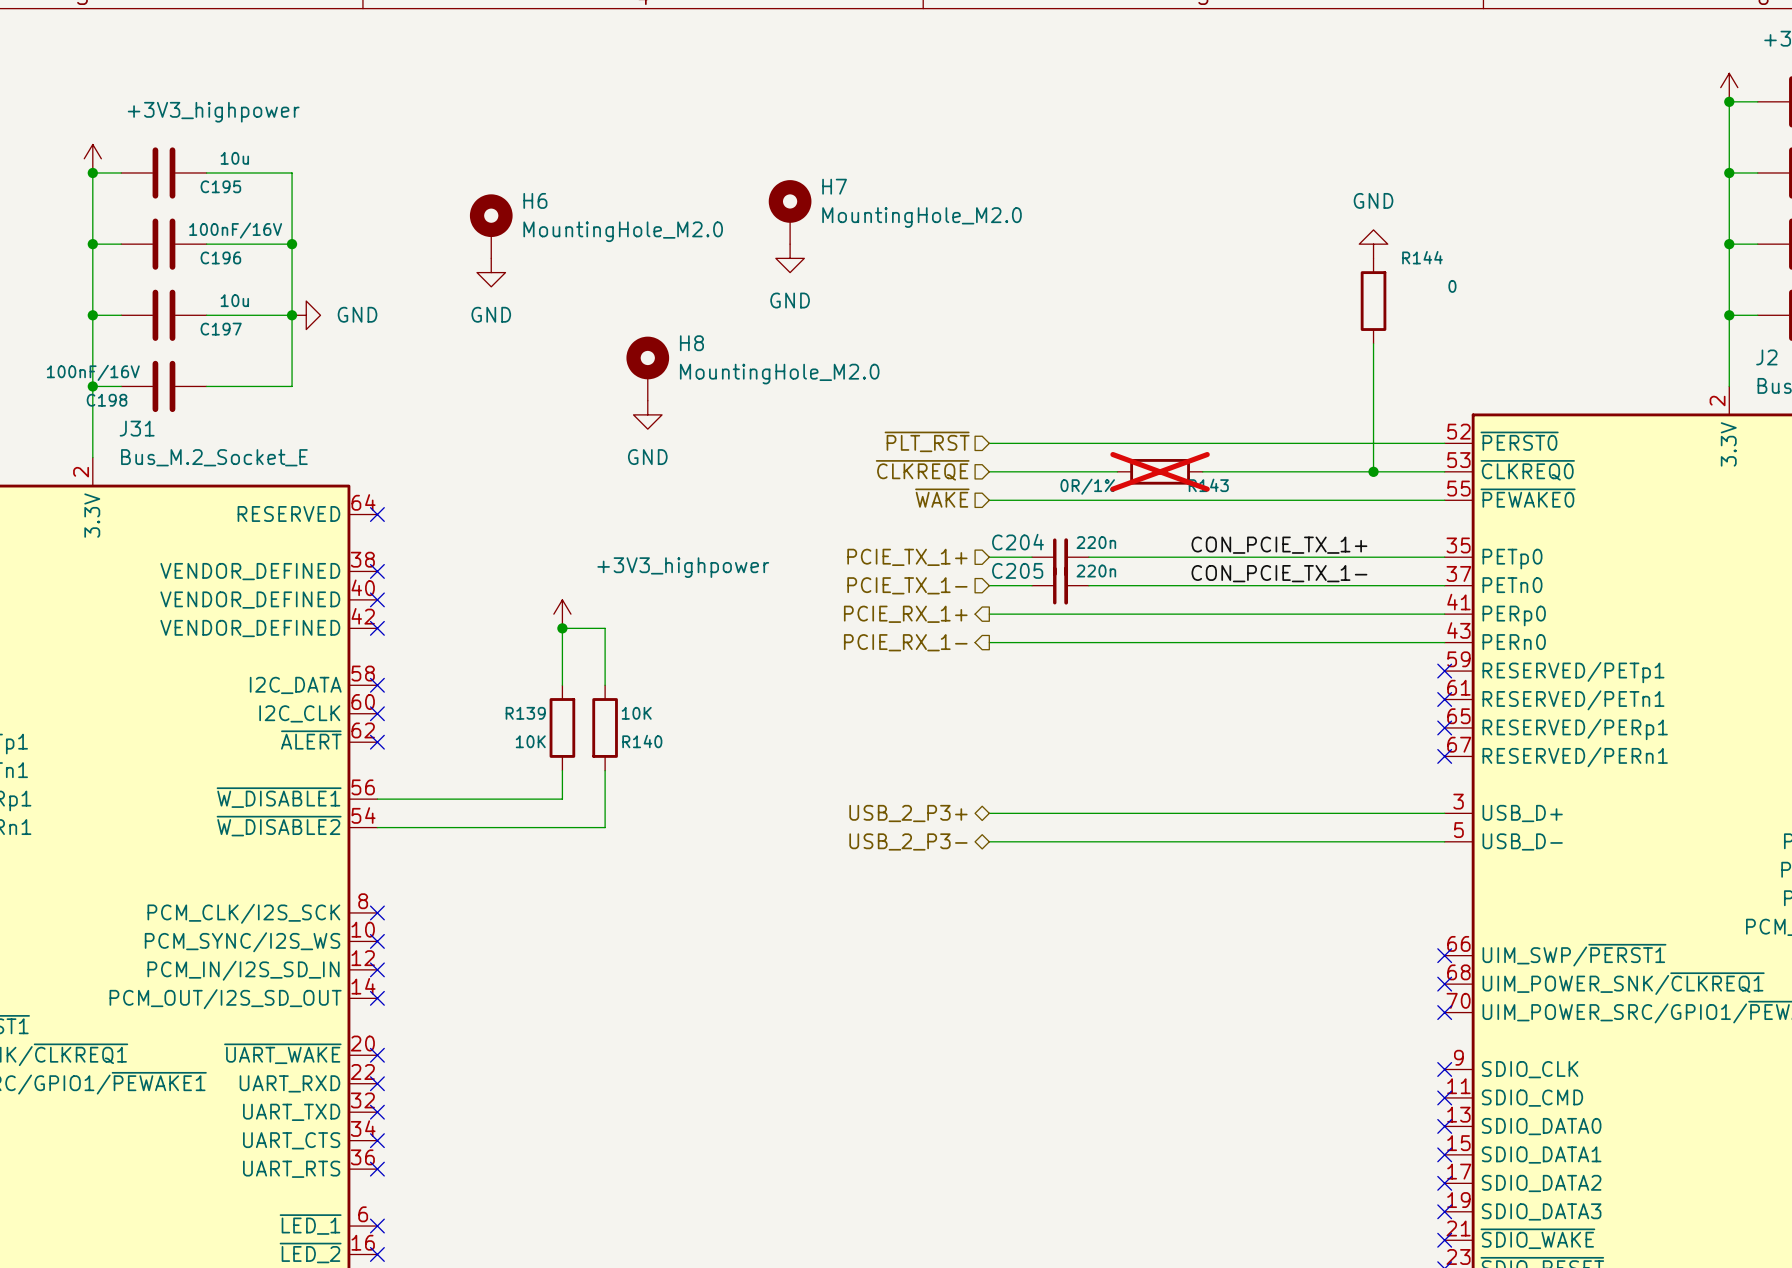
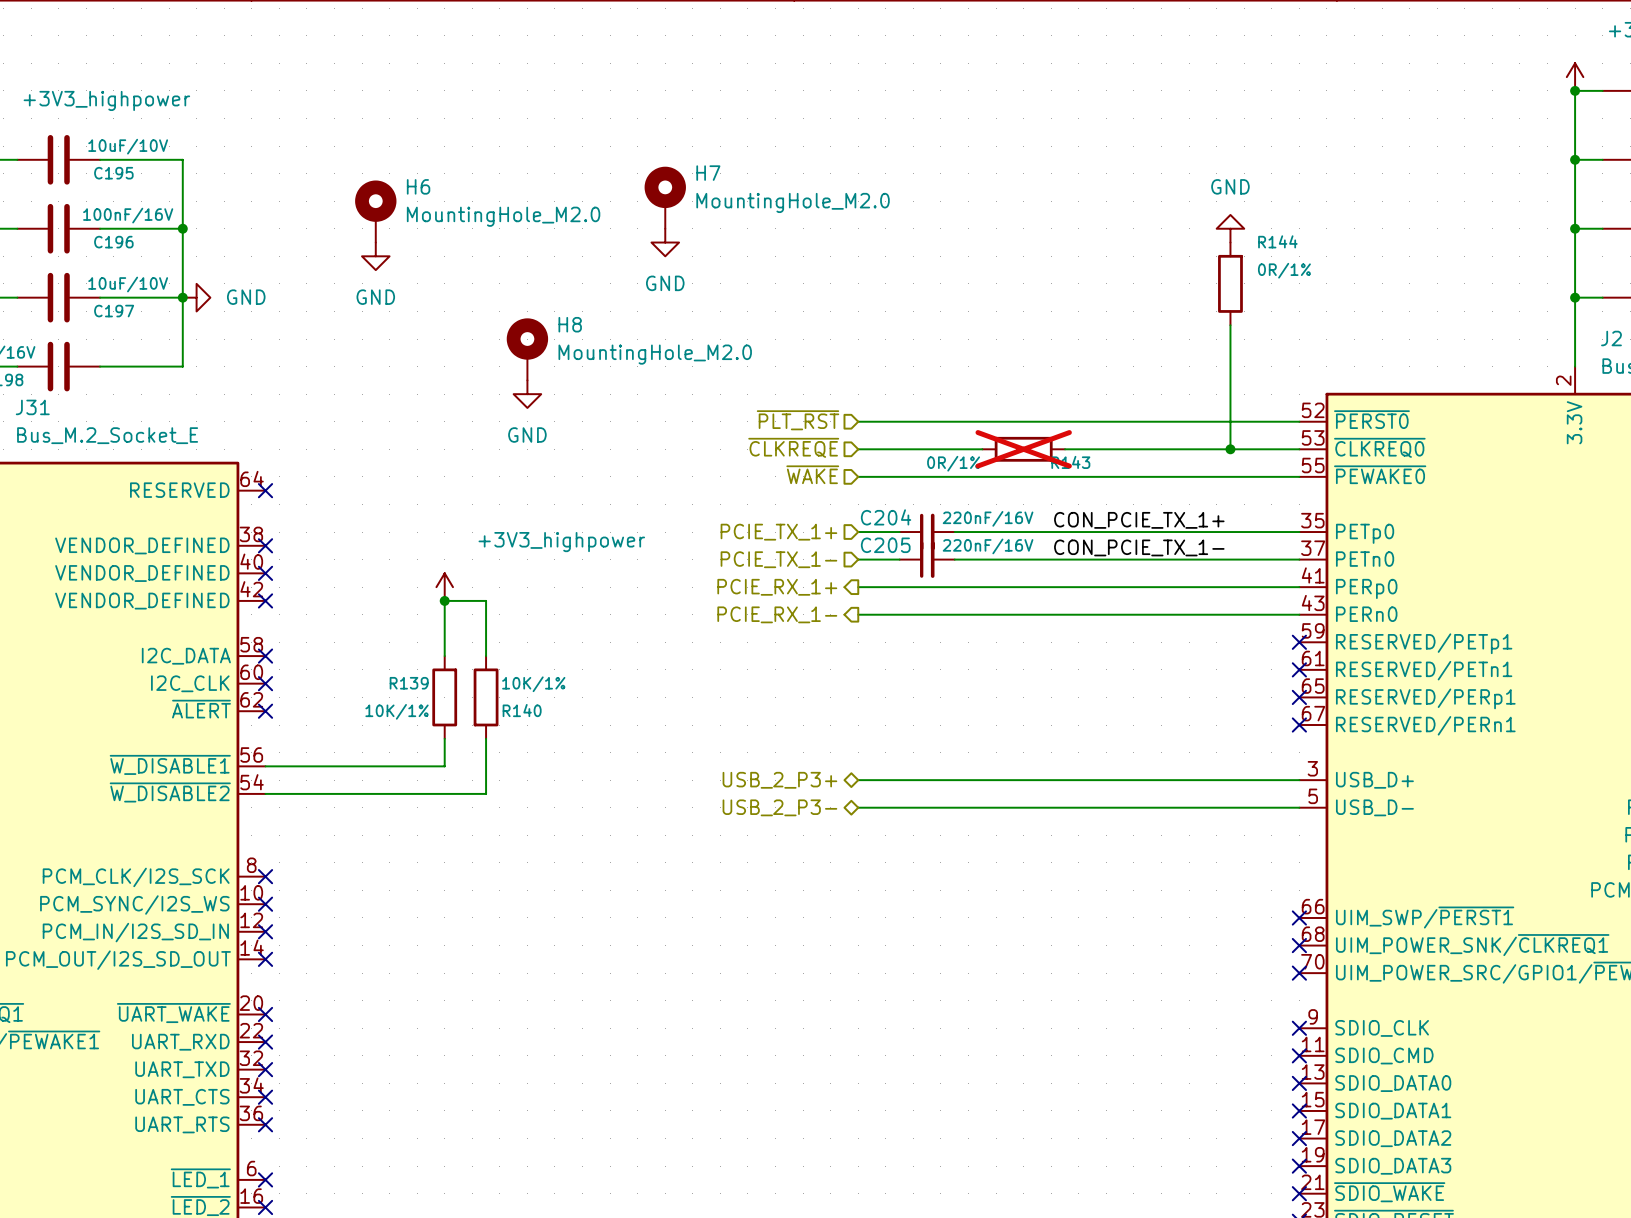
C195 value: 10u (234, 158) -> 10uF/10V (128, 146)
R144 value: 0 (1452, 286) -> 0R/1% (1284, 270)
C197 value: 10u (234, 300) -> 10uF/10V (128, 284)
C204 value: 220n (1096, 542) -> 220nF/16V (988, 518)
C205 value: 220n (1096, 571) -> 220nF/16V (988, 546)
R140 value: 10K (636, 713) -> 10K/1% (533, 684)
R139 value: 10K (530, 741) -> 10K/1% (397, 711)

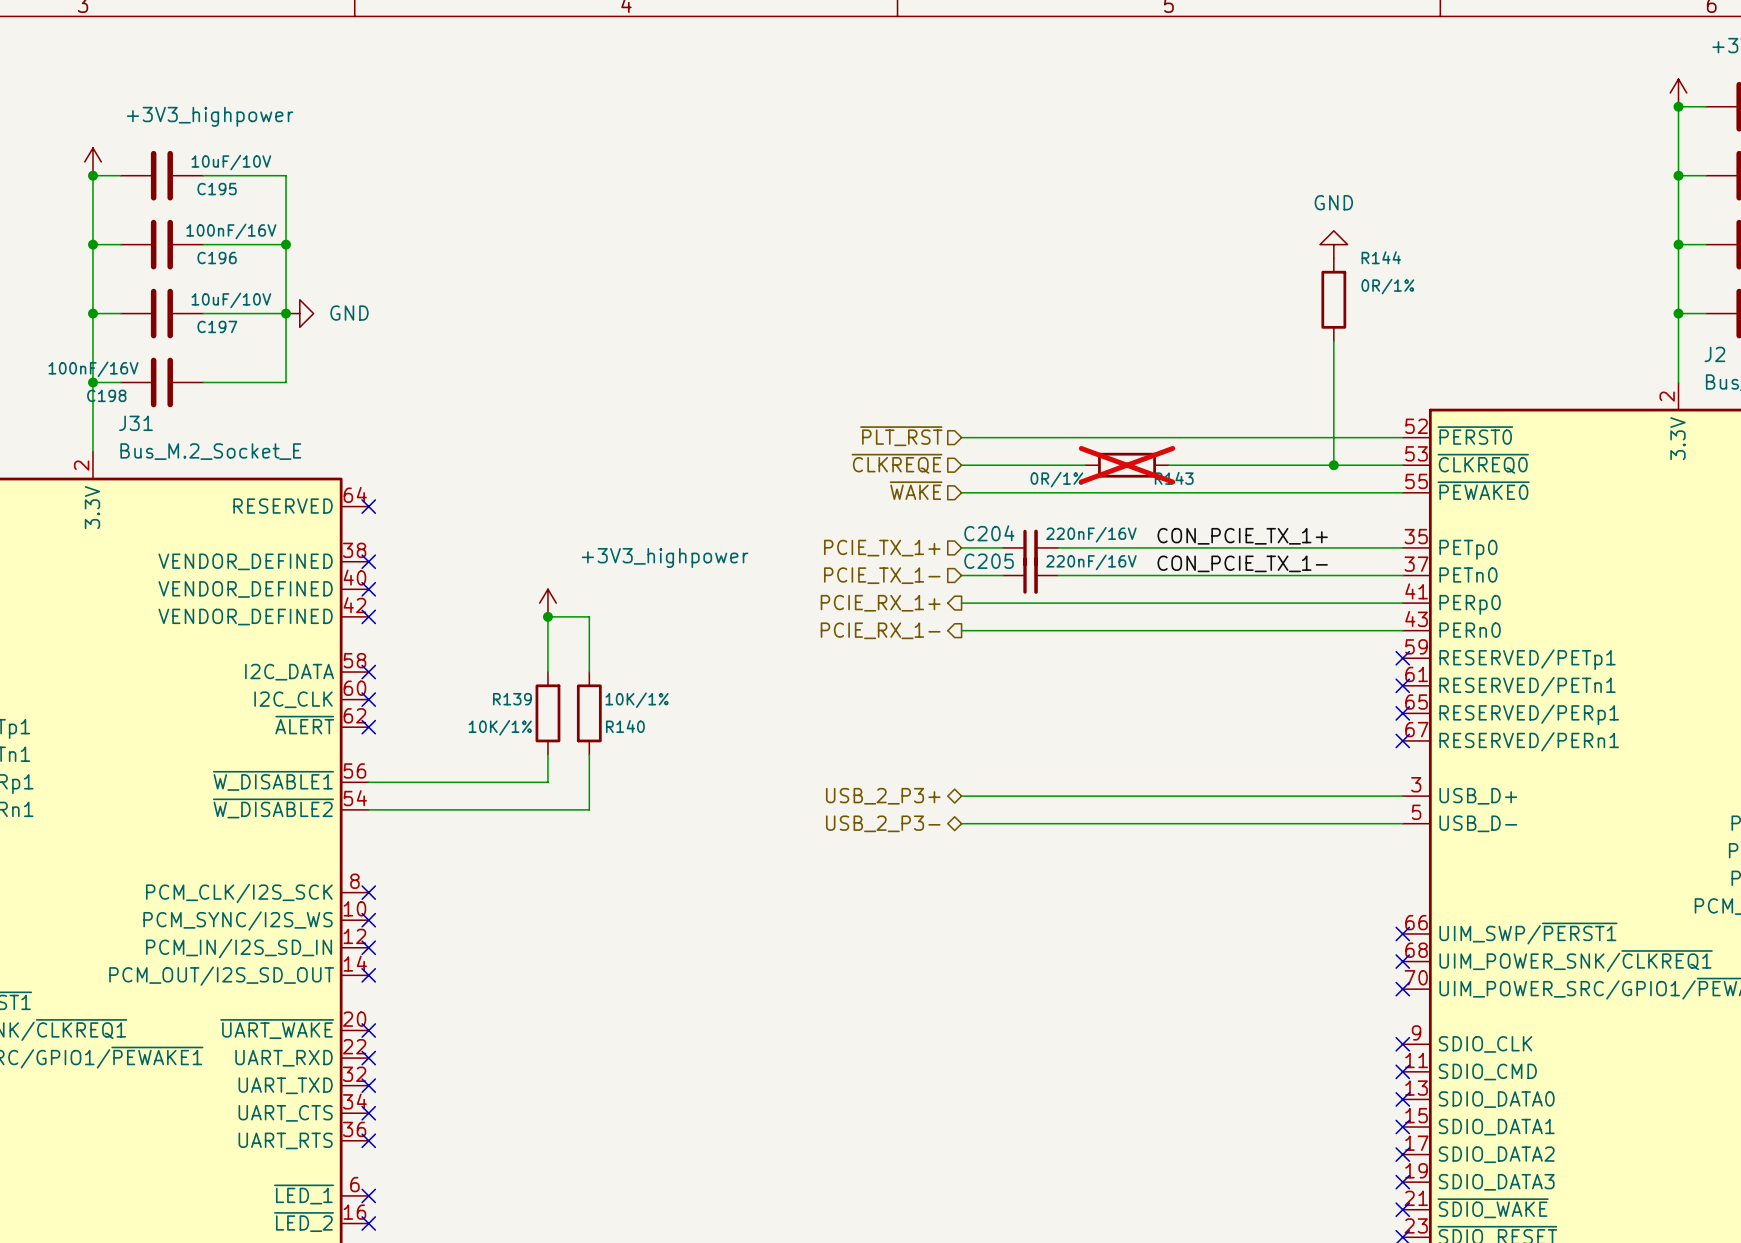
H7: MountingHole_M2.0 (665, 197) -> none
H6: MountingHole_M2.0 (375, 211) -> none
power symbol: GND (665, 242) -> none
power symbol: GND (375, 256) -> none
H8: MountingHole_M2.0 (527, 349) -> none
power symbol: GND (527, 394) -> none

